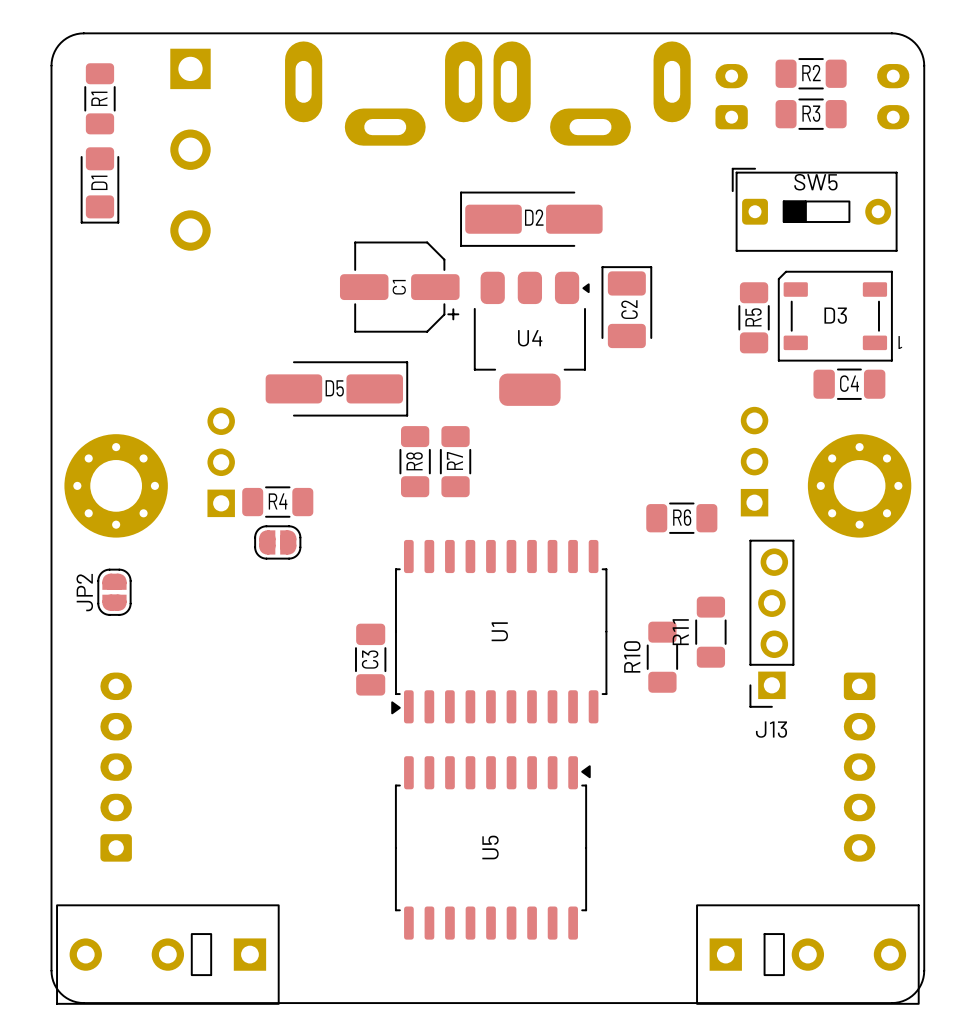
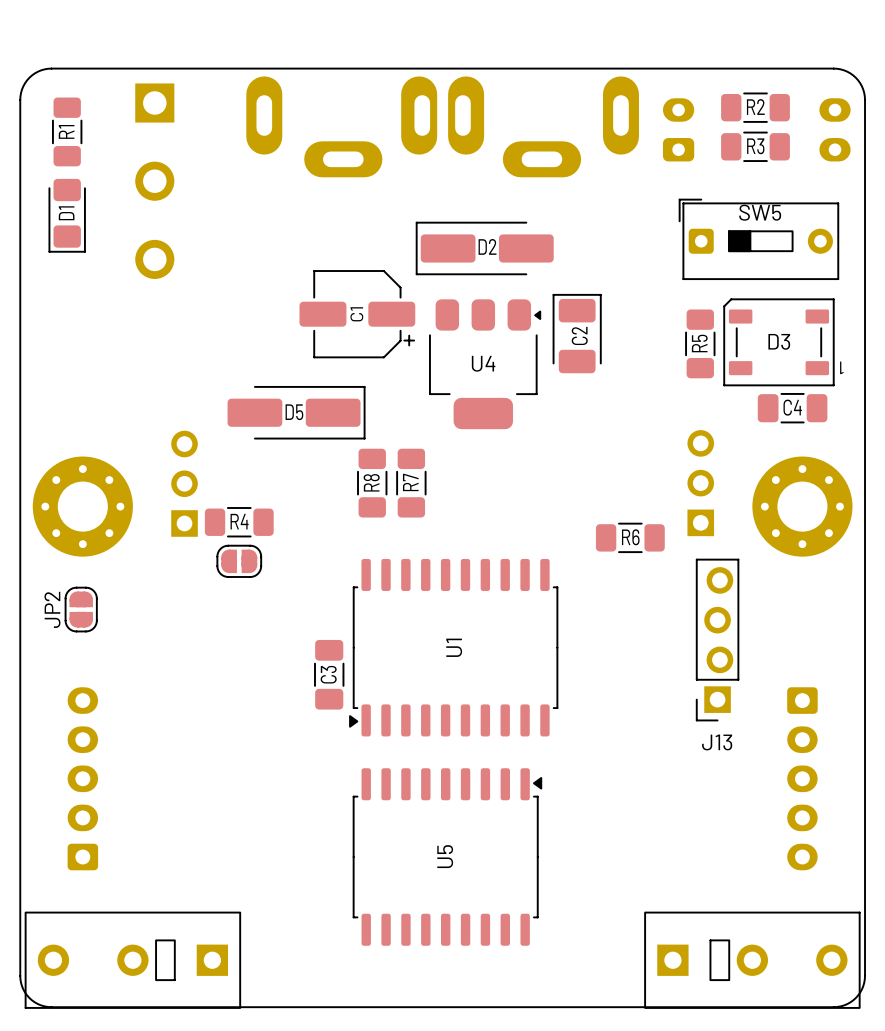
R11: (710, 632) -> none
R10: (662, 657) -> none

